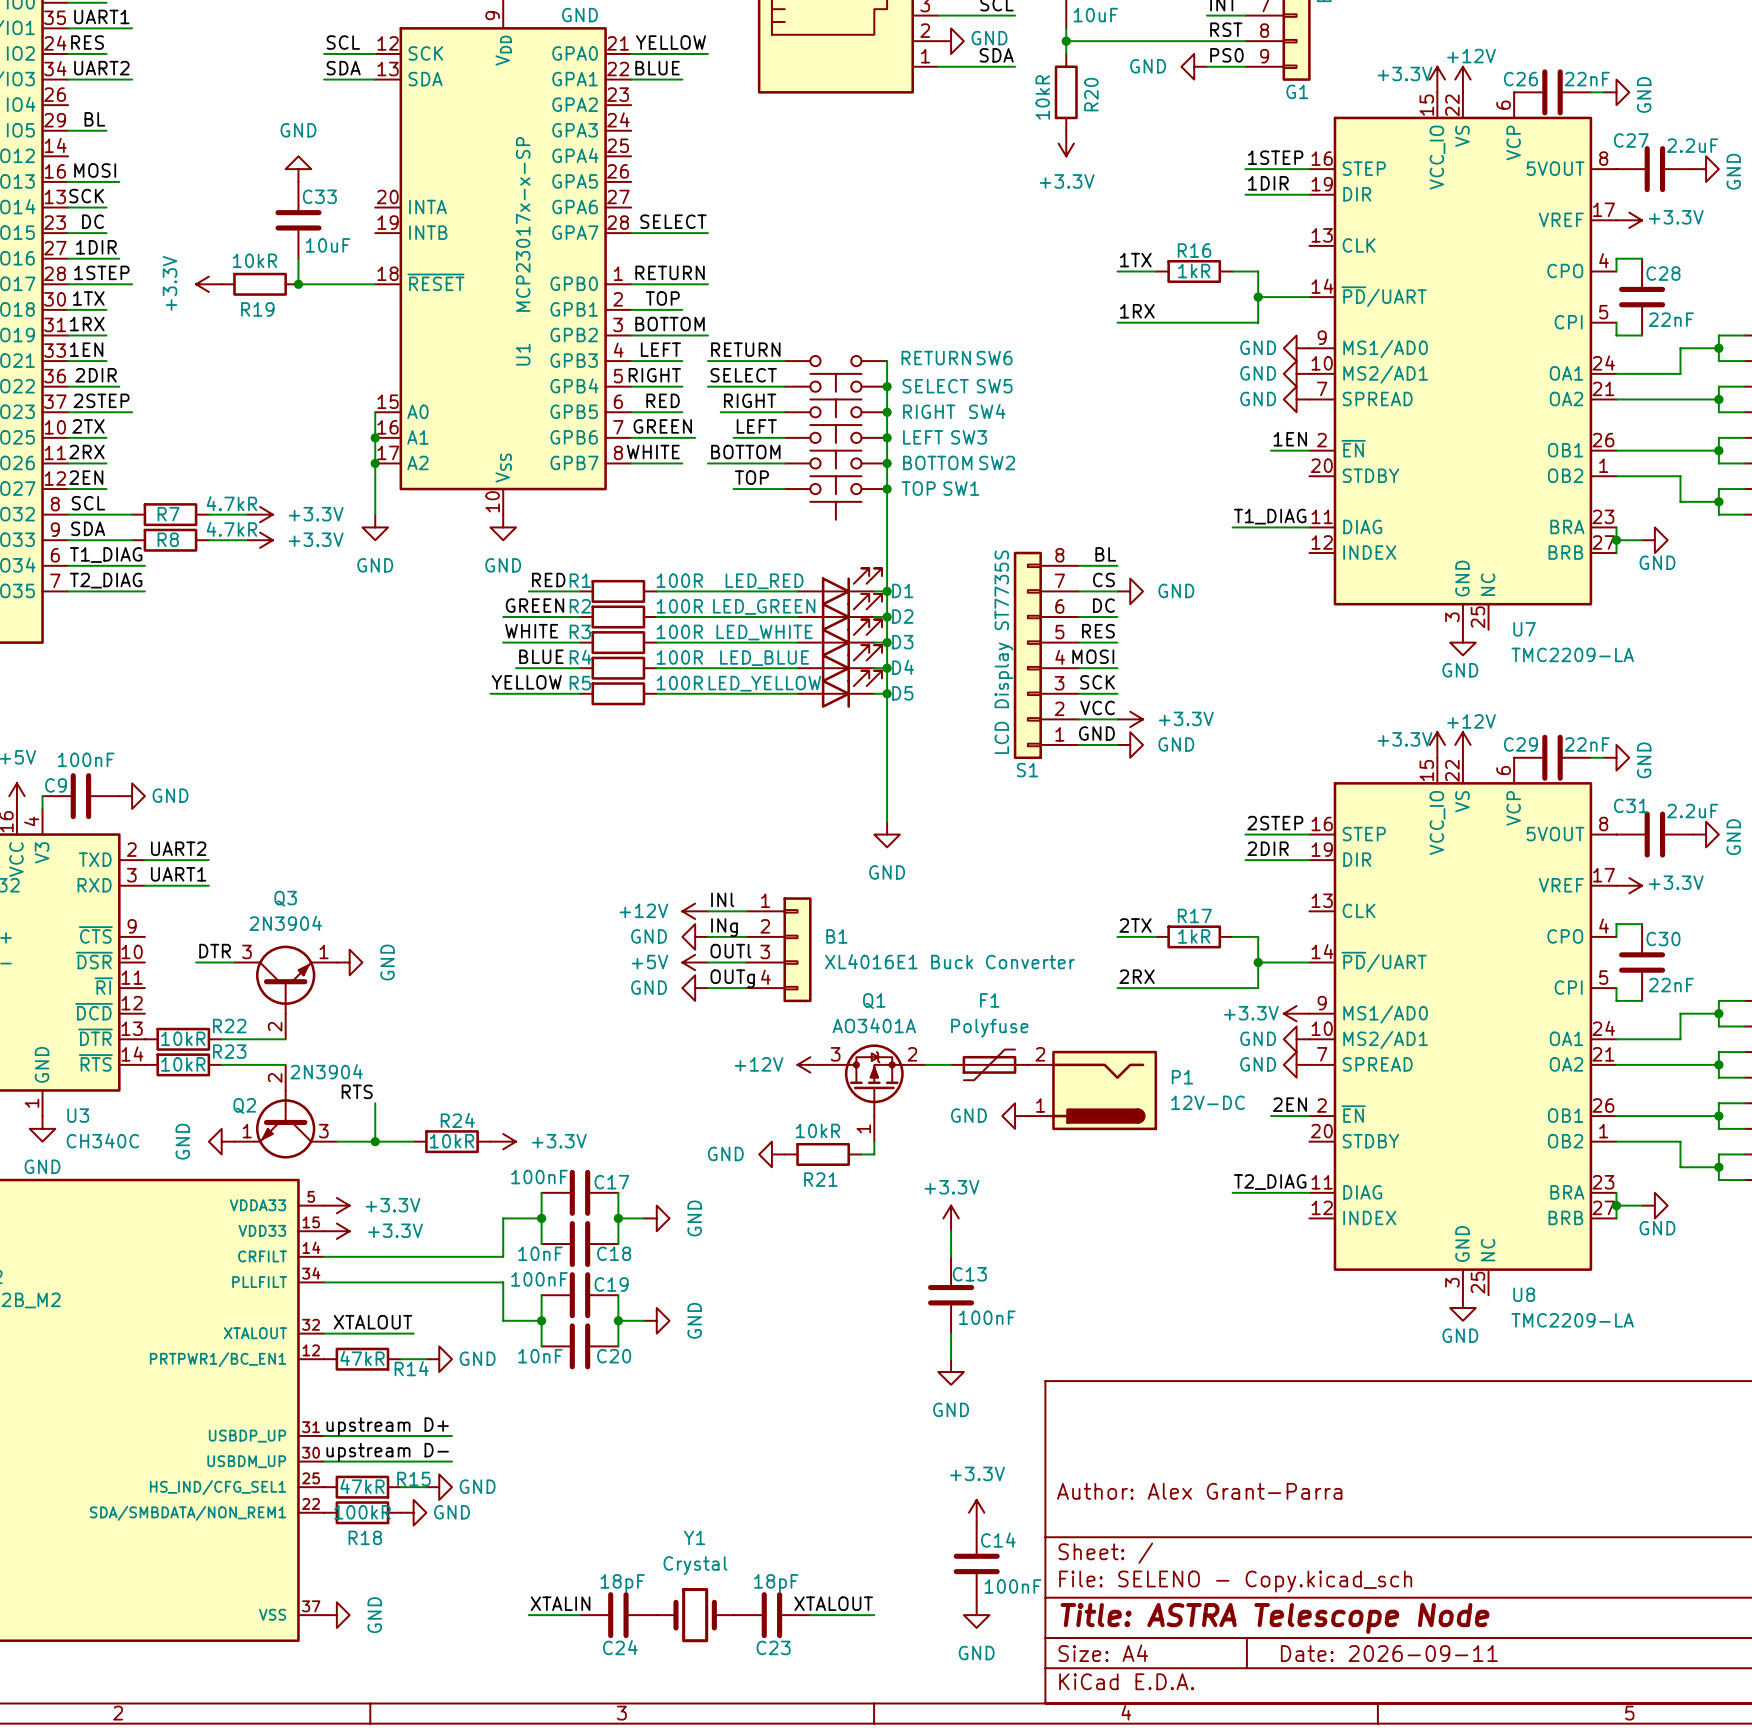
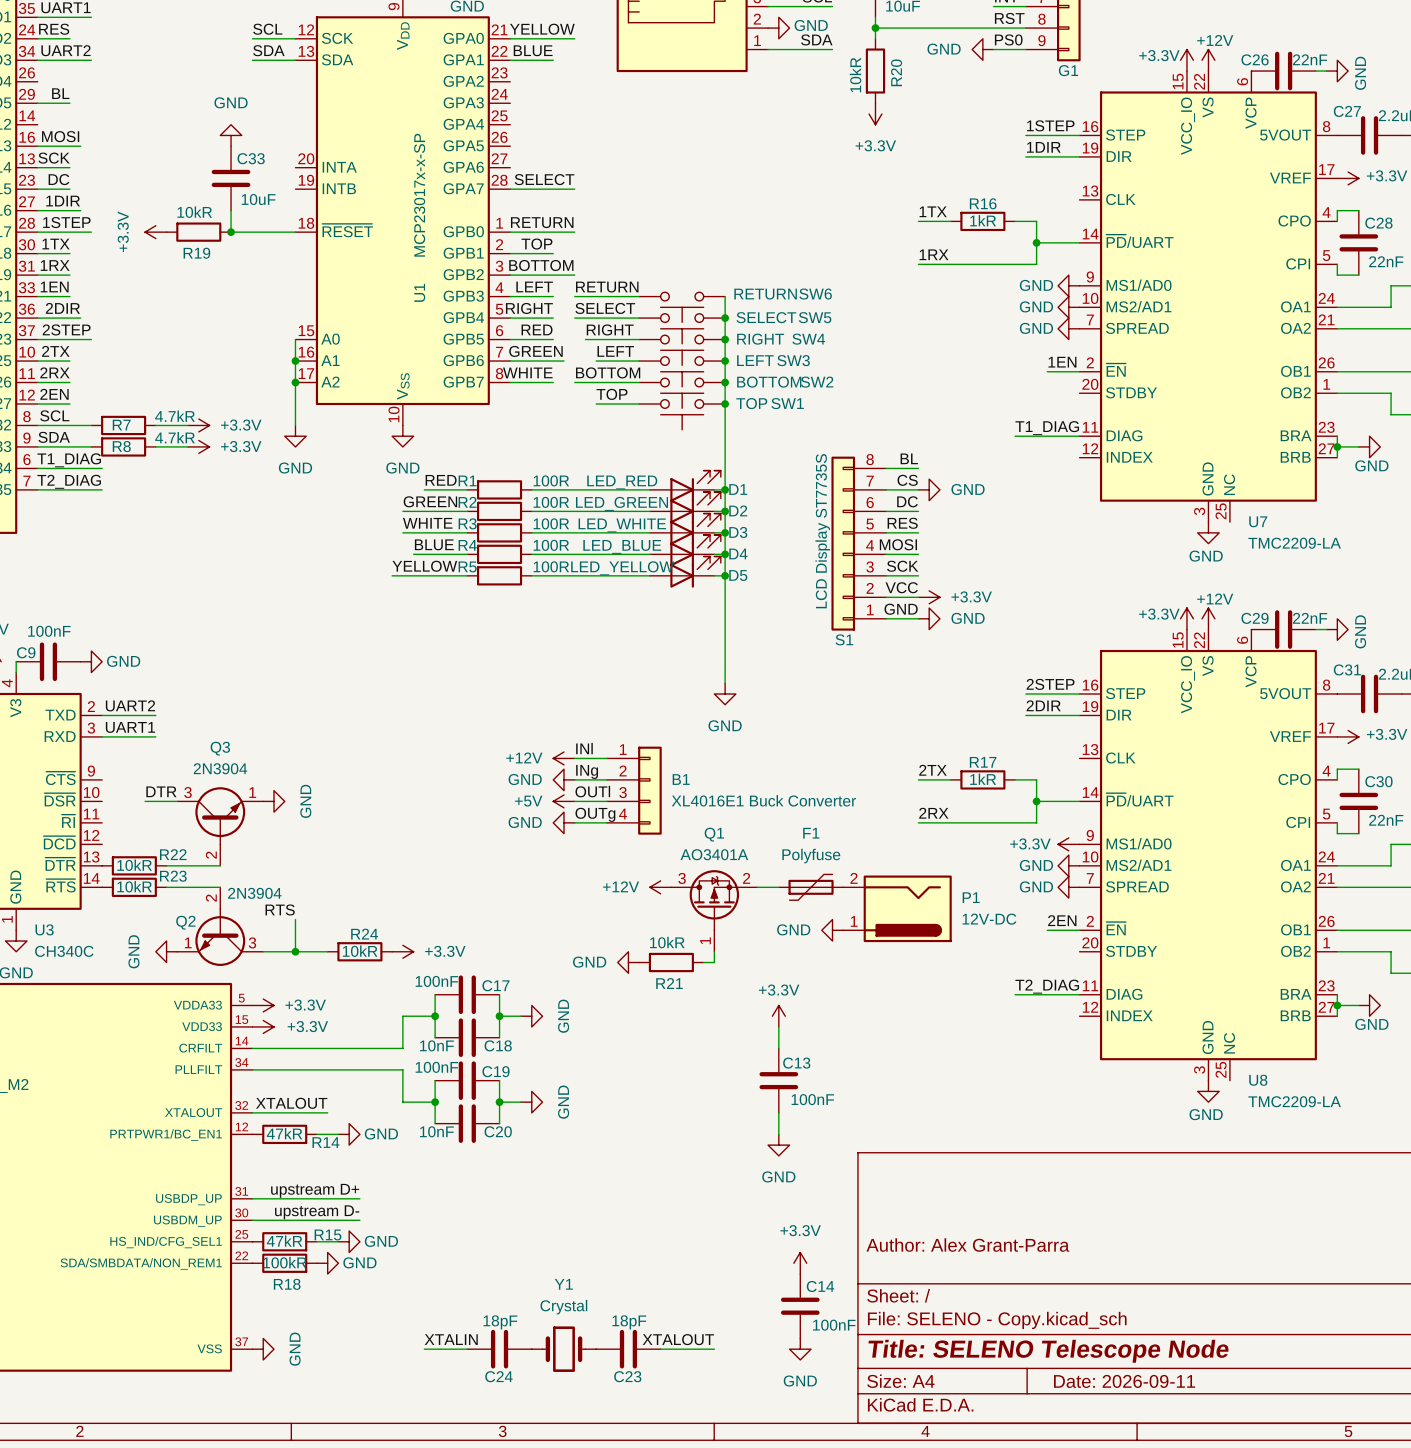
title block: Title: ASTRA Telescope Node (1274, 1618) -> Title: SELENO Telescope Node (1048, 1351)

